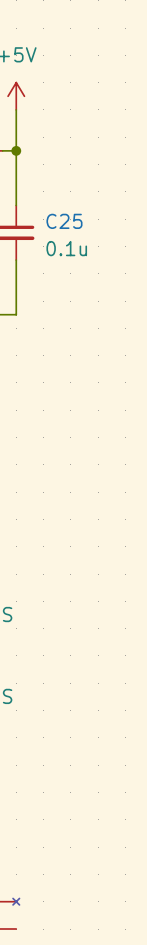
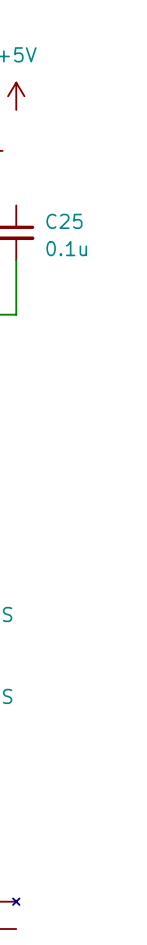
wire: (16, 109) (16, 205) -> none
wire: (2, 150) (16, 150) -> none
junction: (16, 150) -> none

